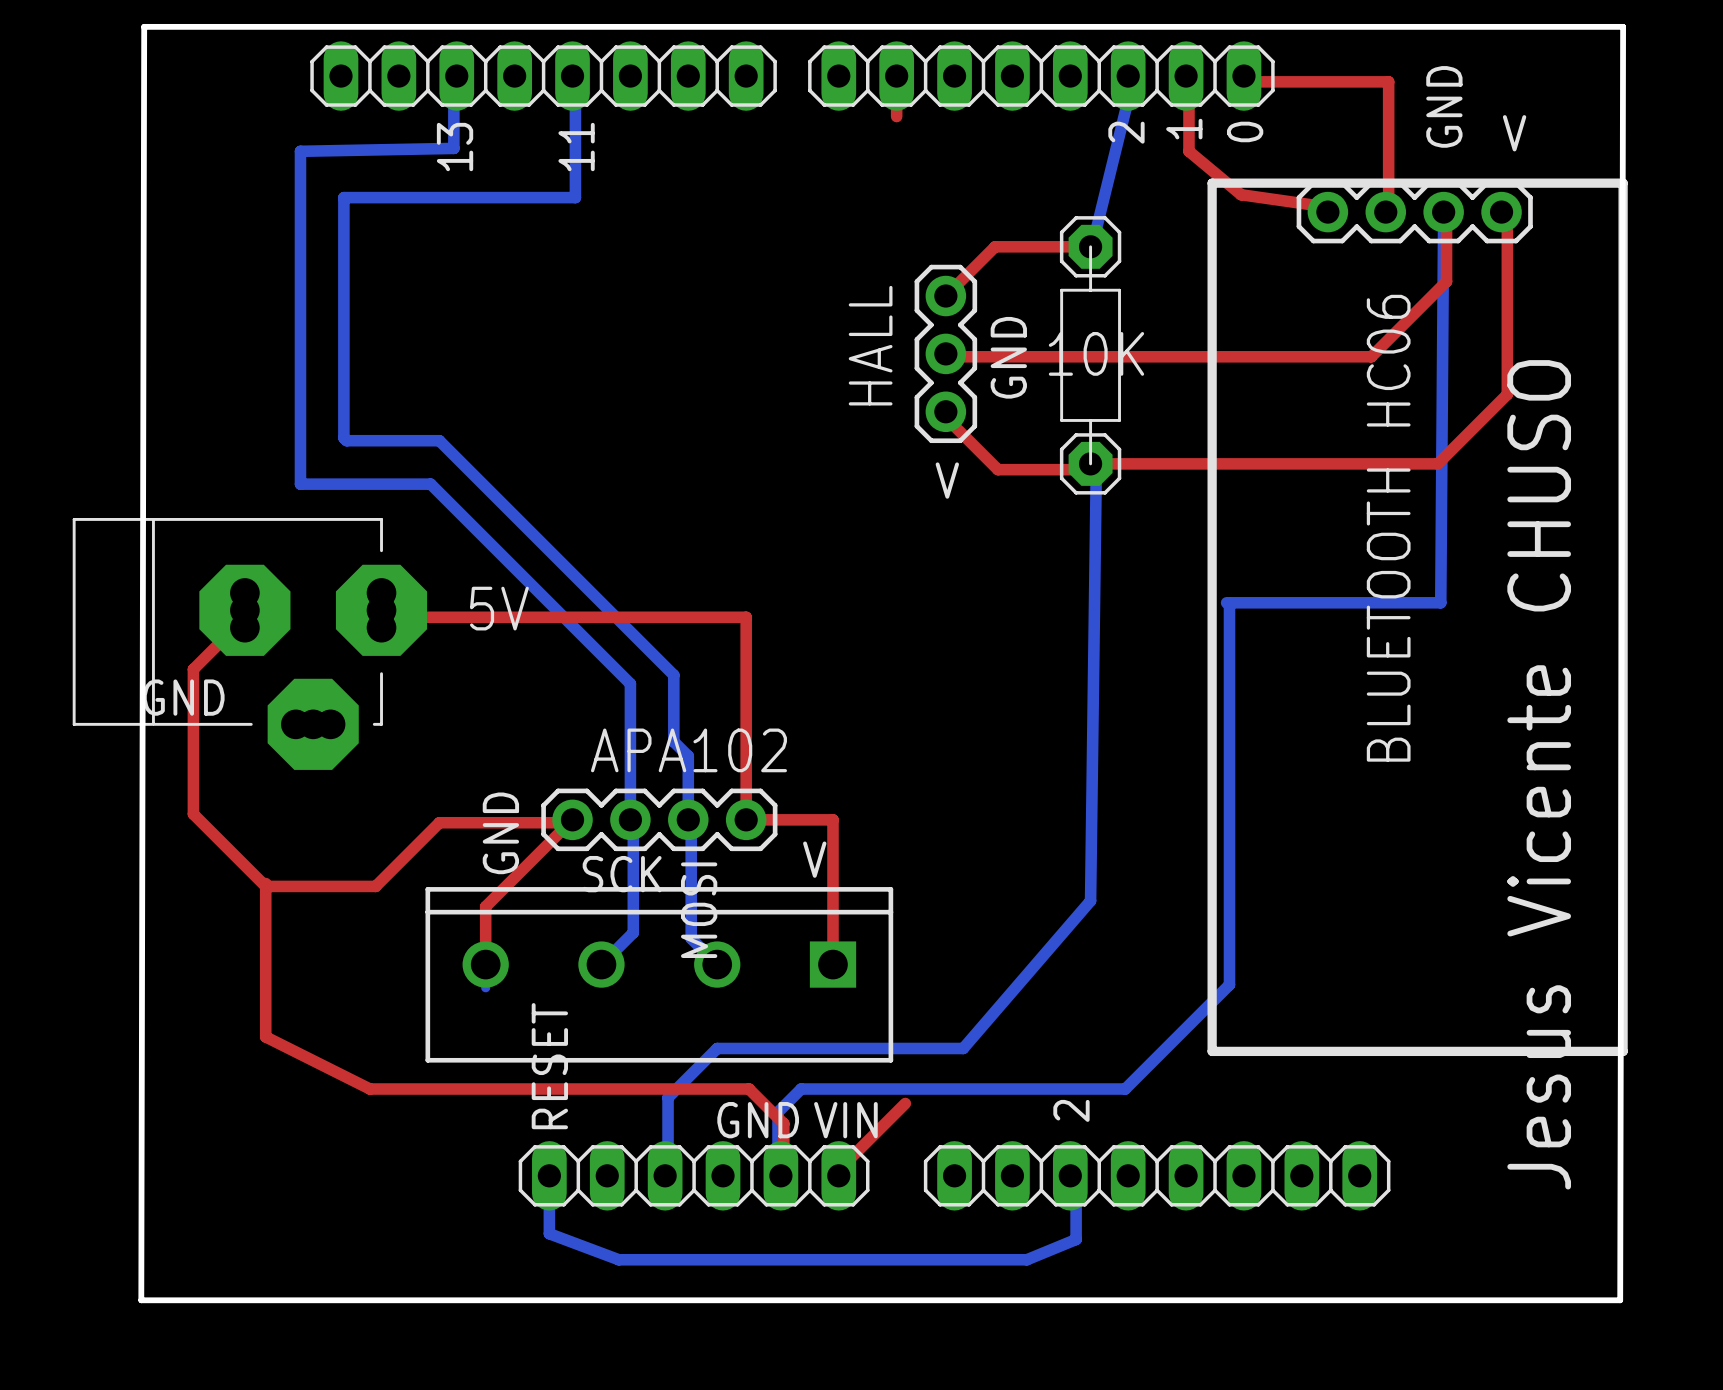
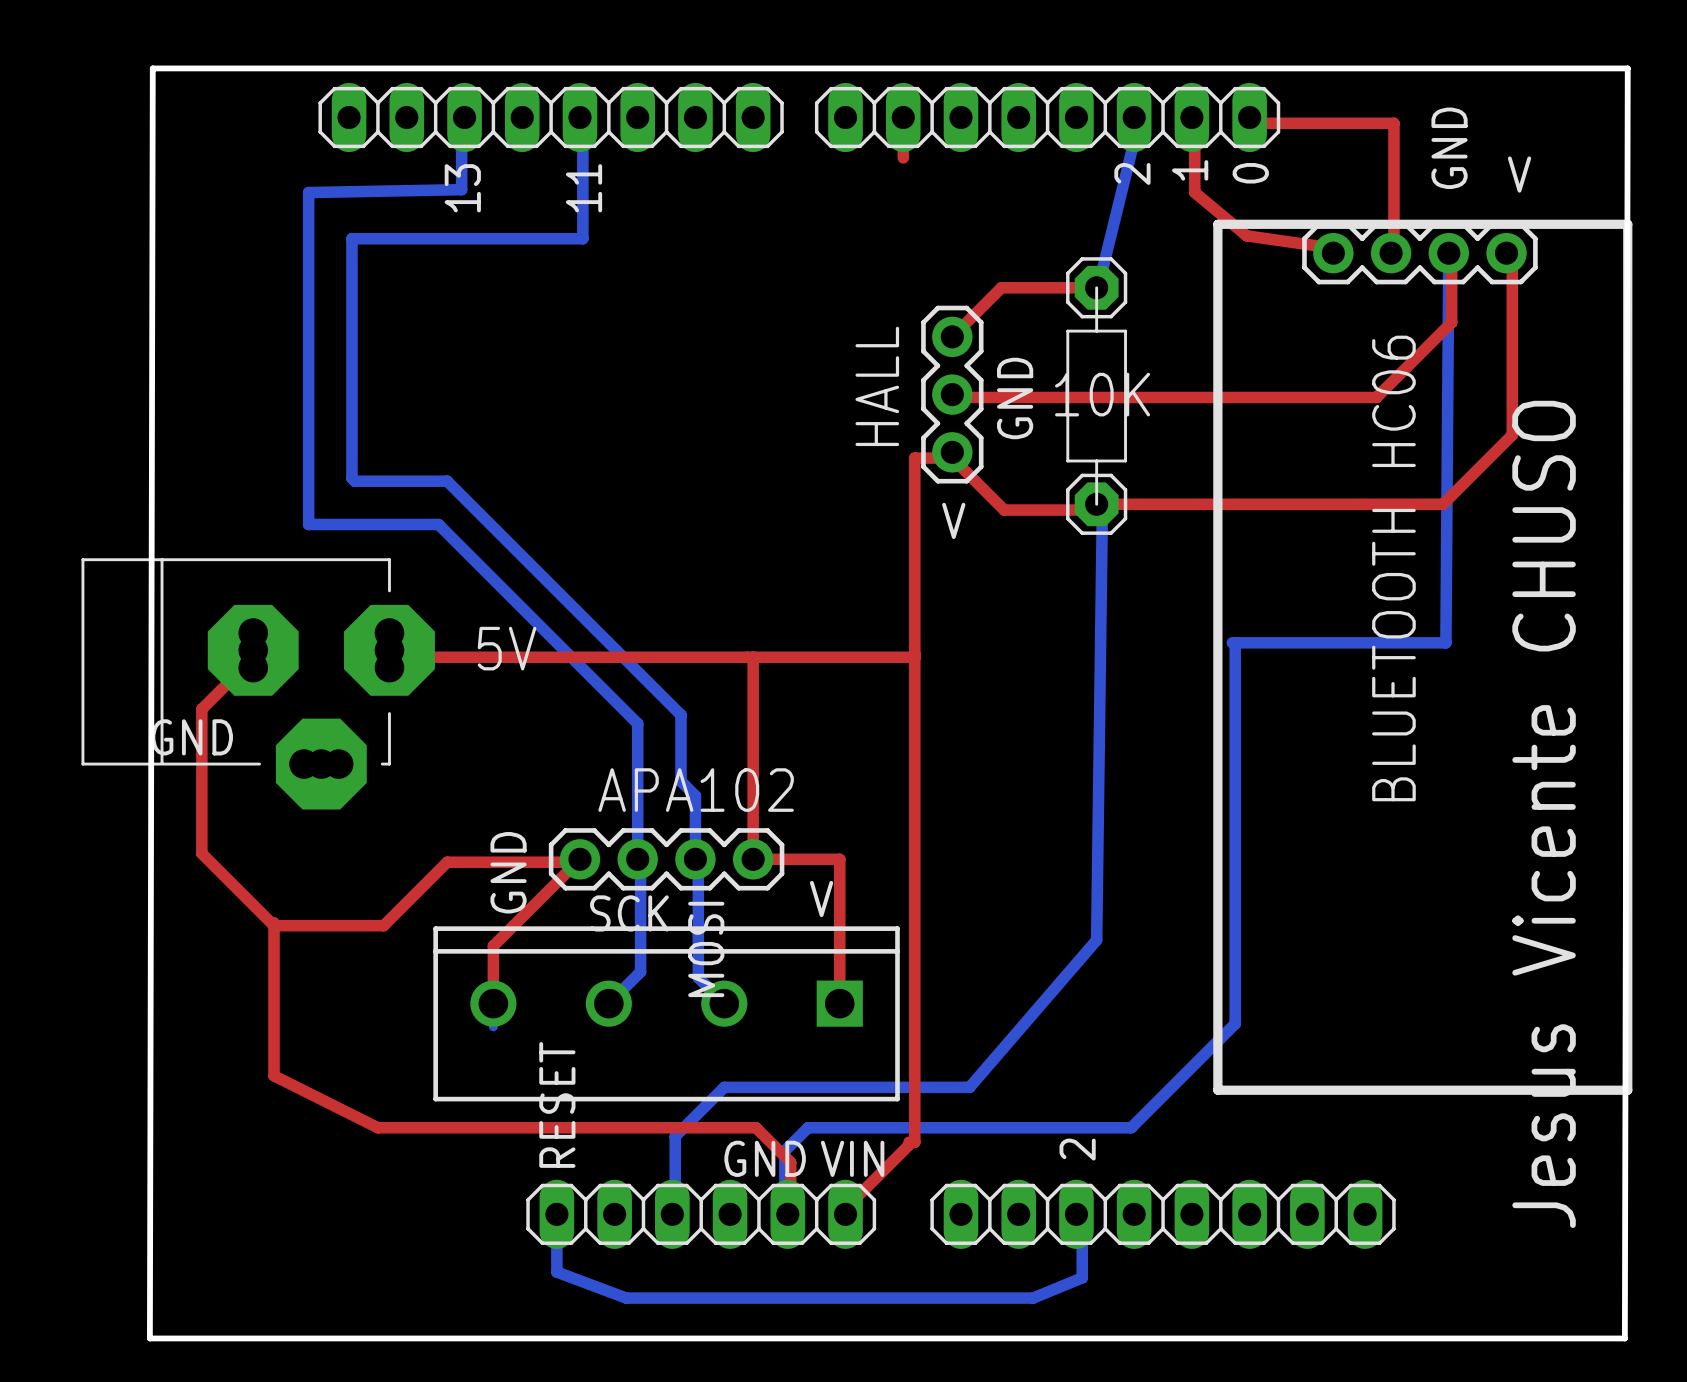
top track: none -> (952, 458) (914, 458) (914, 1142) (909, 1142)
top track: none -> (753, 657) (914, 657)

